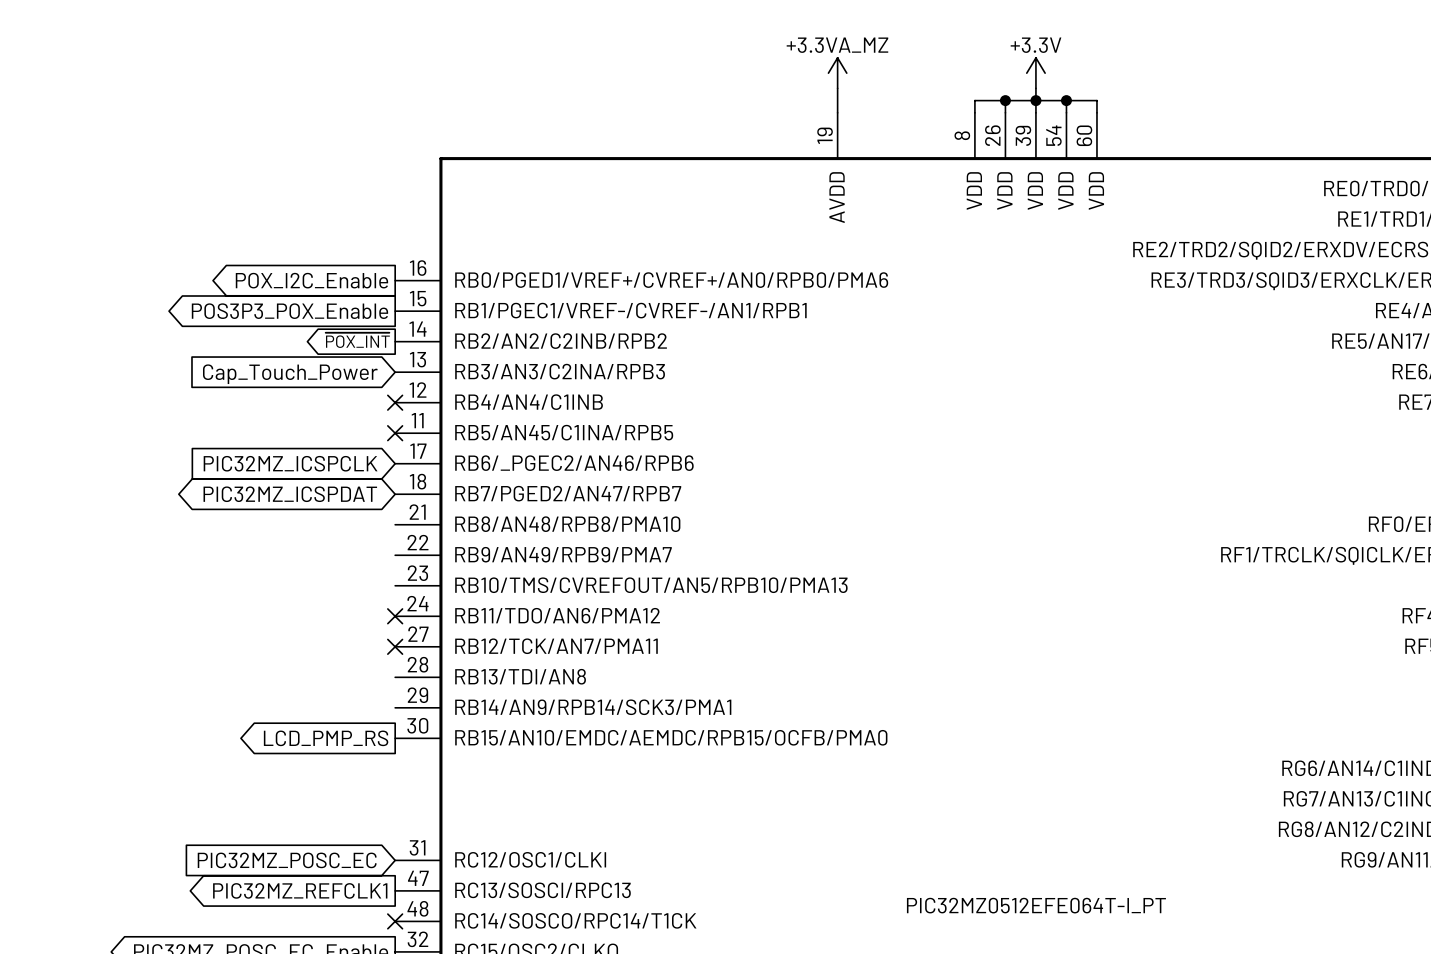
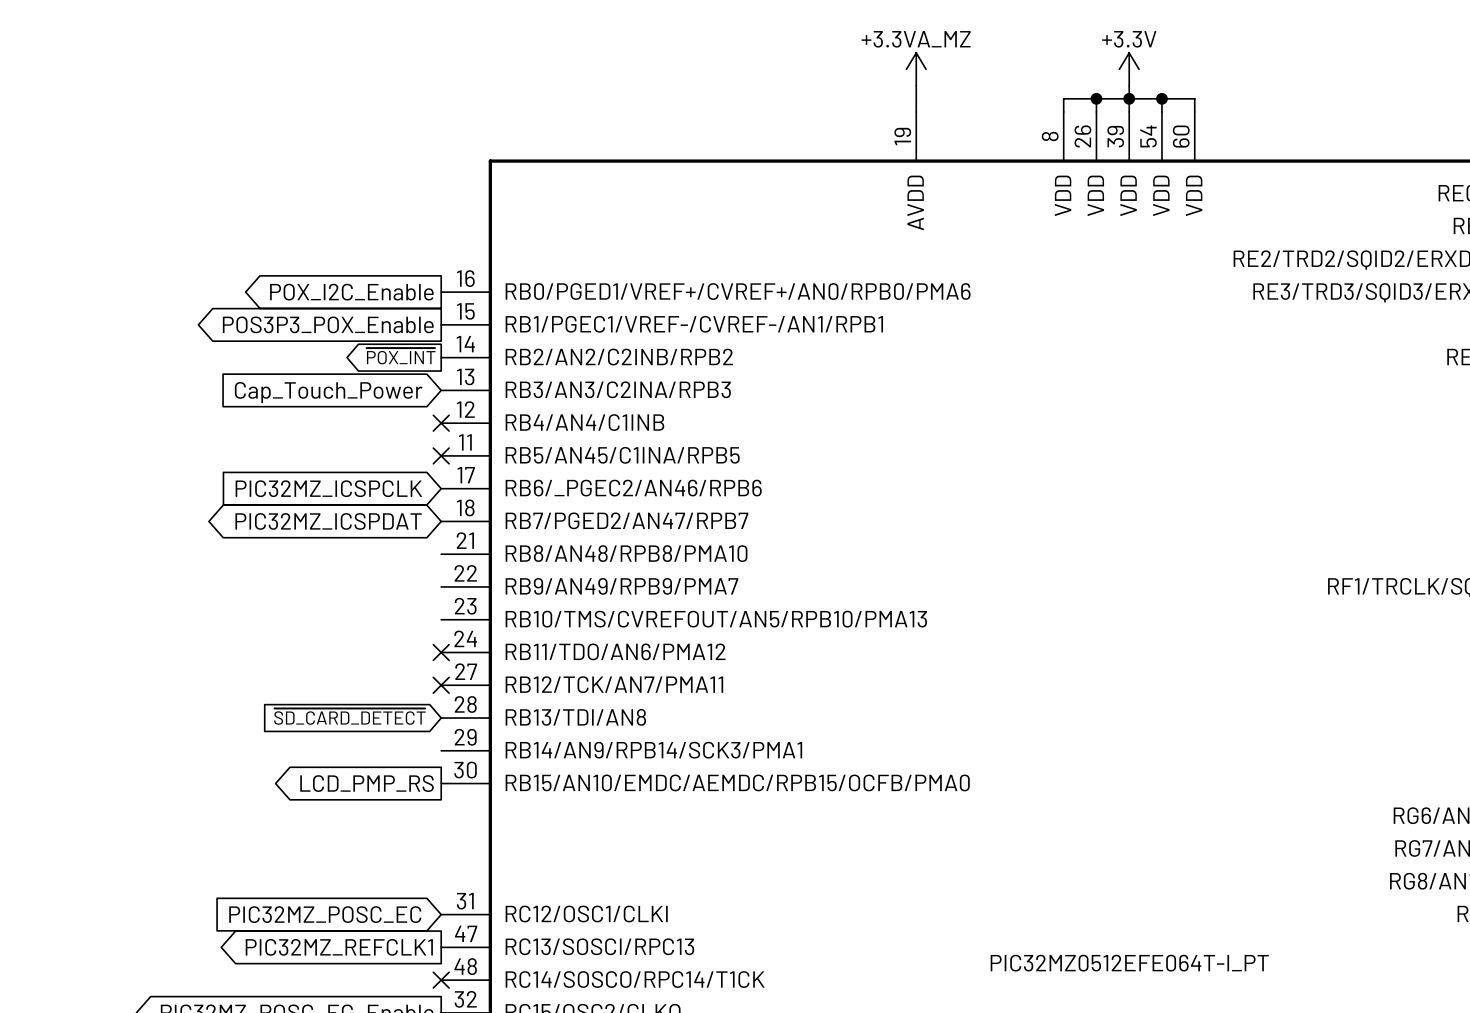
global label: none -> ~{SD_CARD_DETECT} (349, 716)

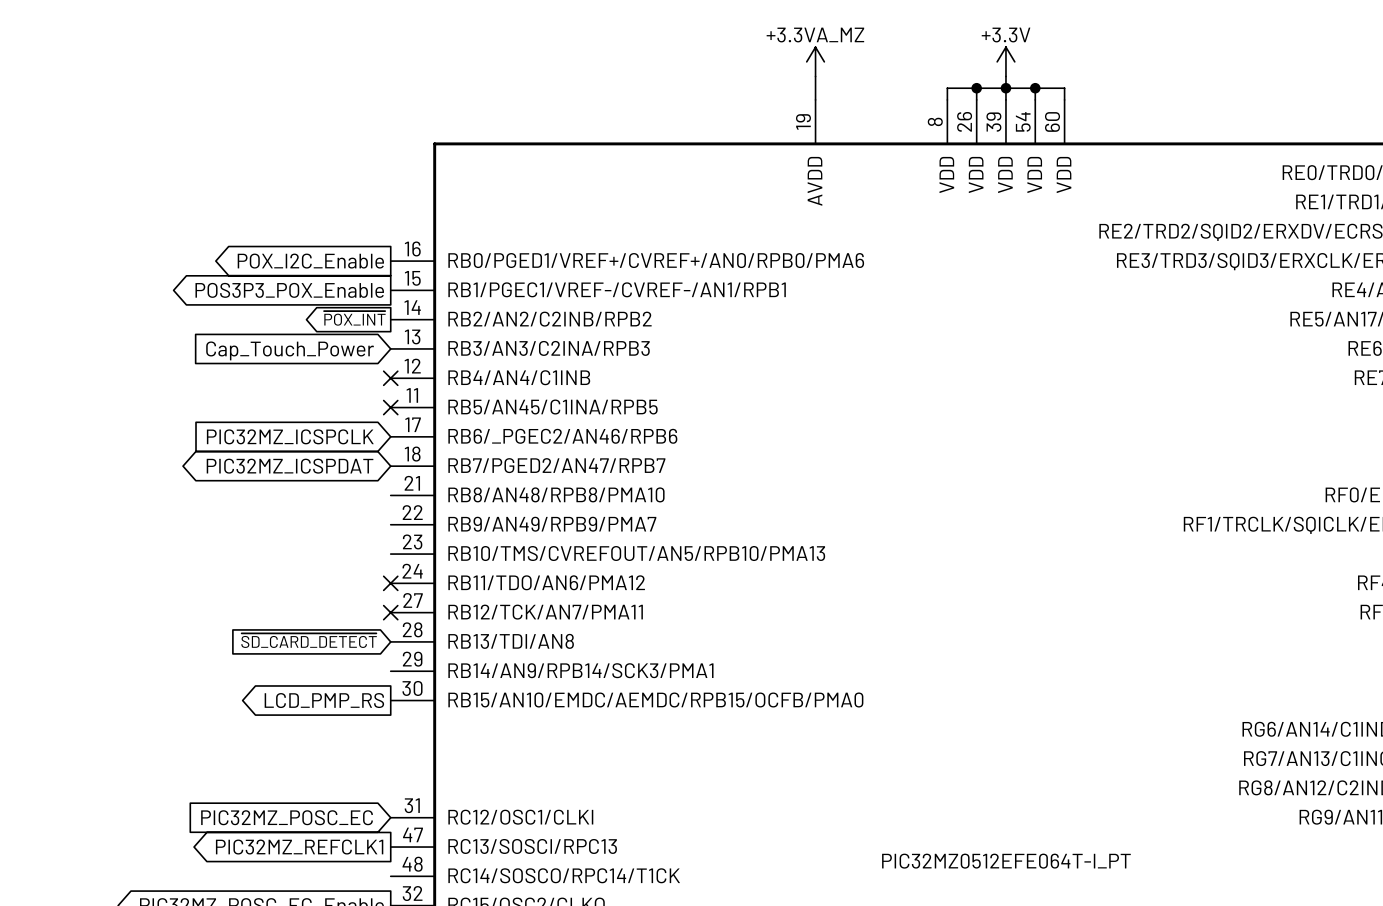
no-connect mark: (441, 980) -> none

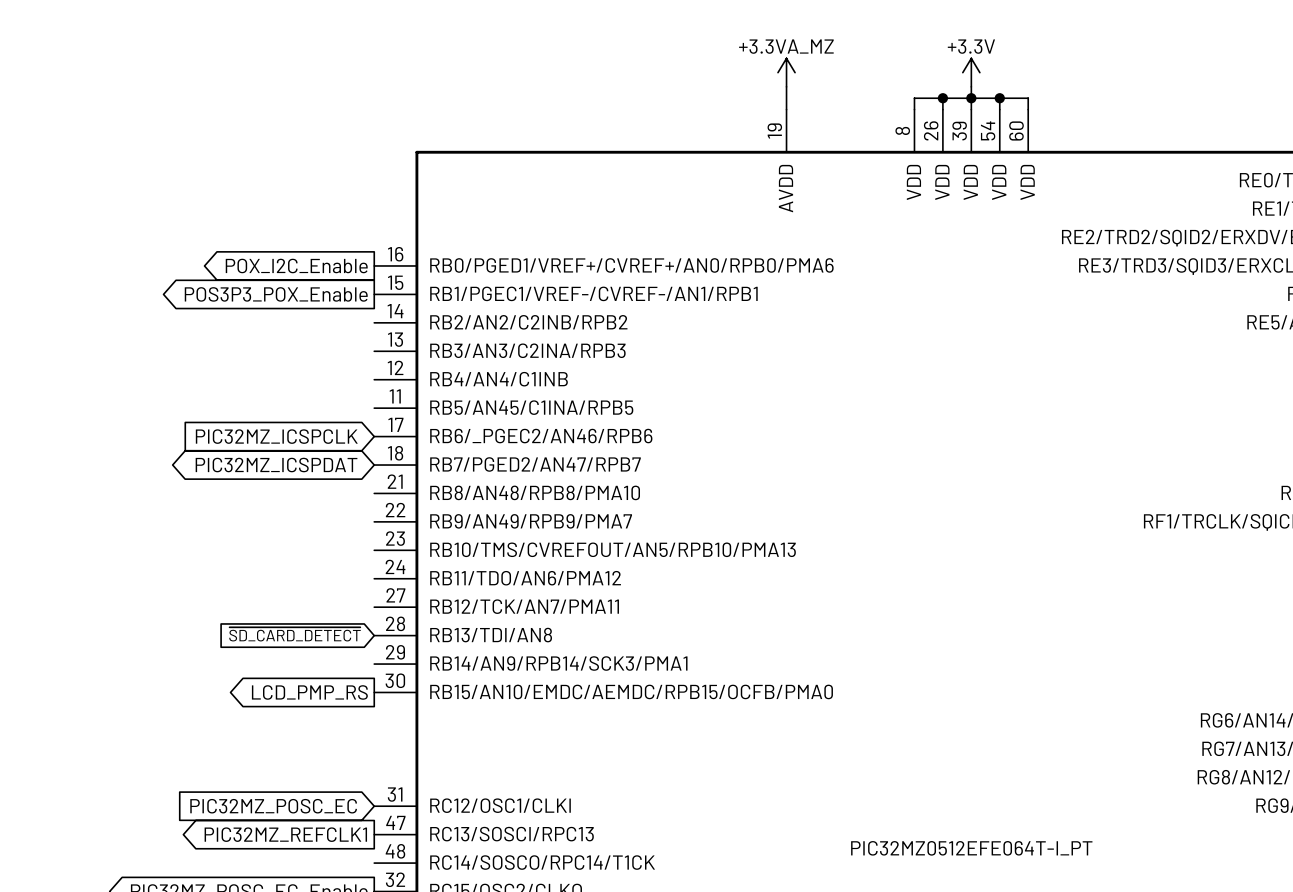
global label: ~{POX_INT} (354, 318) -> none
global label: Cap_Touch_Power (290, 350) -> none
no-connect mark: (390, 378) -> none
no-connect mark: (390, 407) -> none
no-connect mark: (390, 583) -> none
no-connect mark: (390, 612) -> none

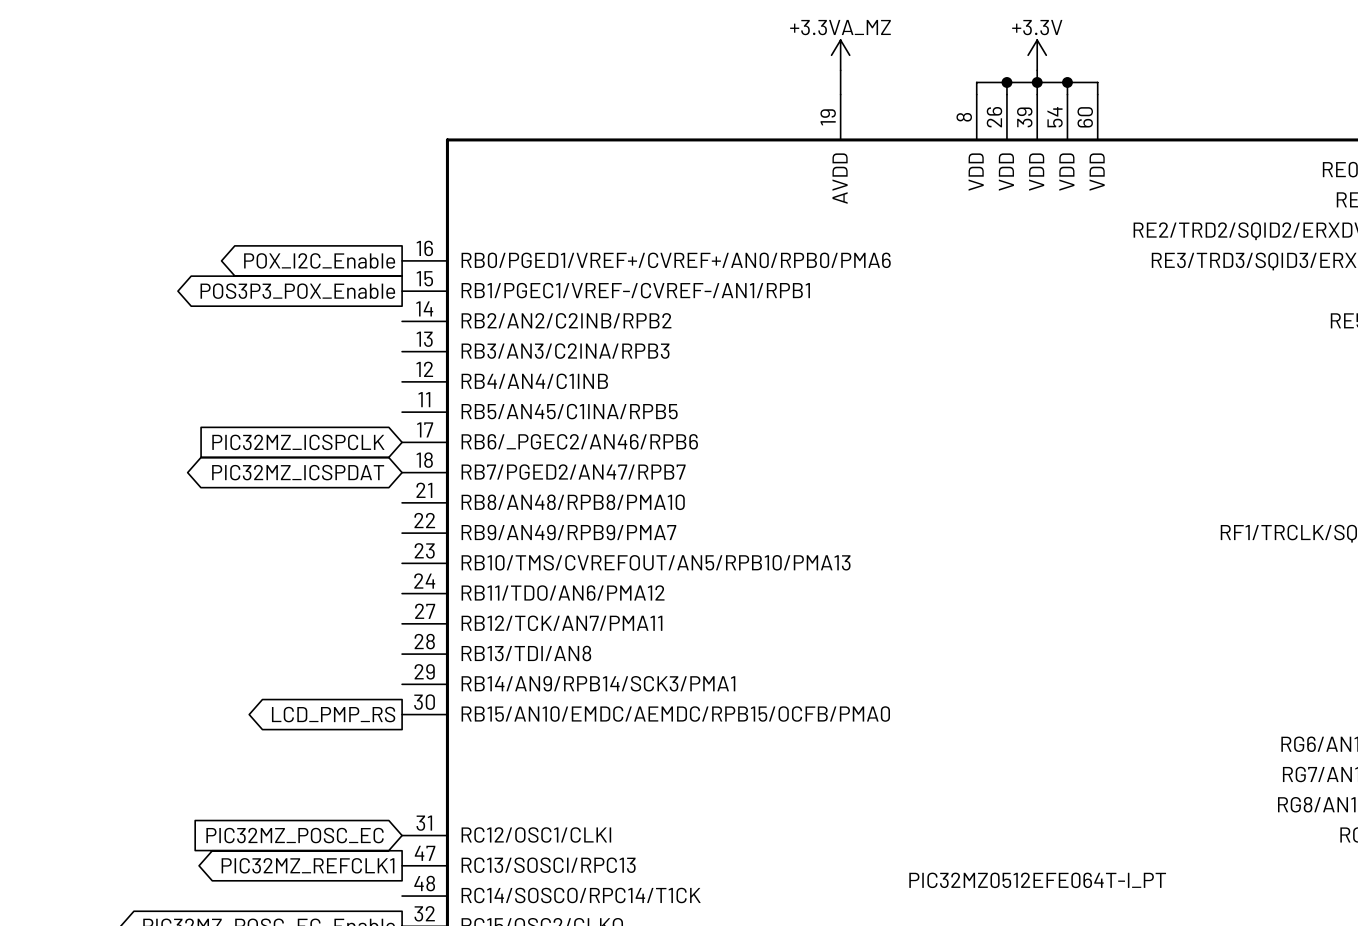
global label: ~{SD_CARD_DETECT} (295, 634) -> none

